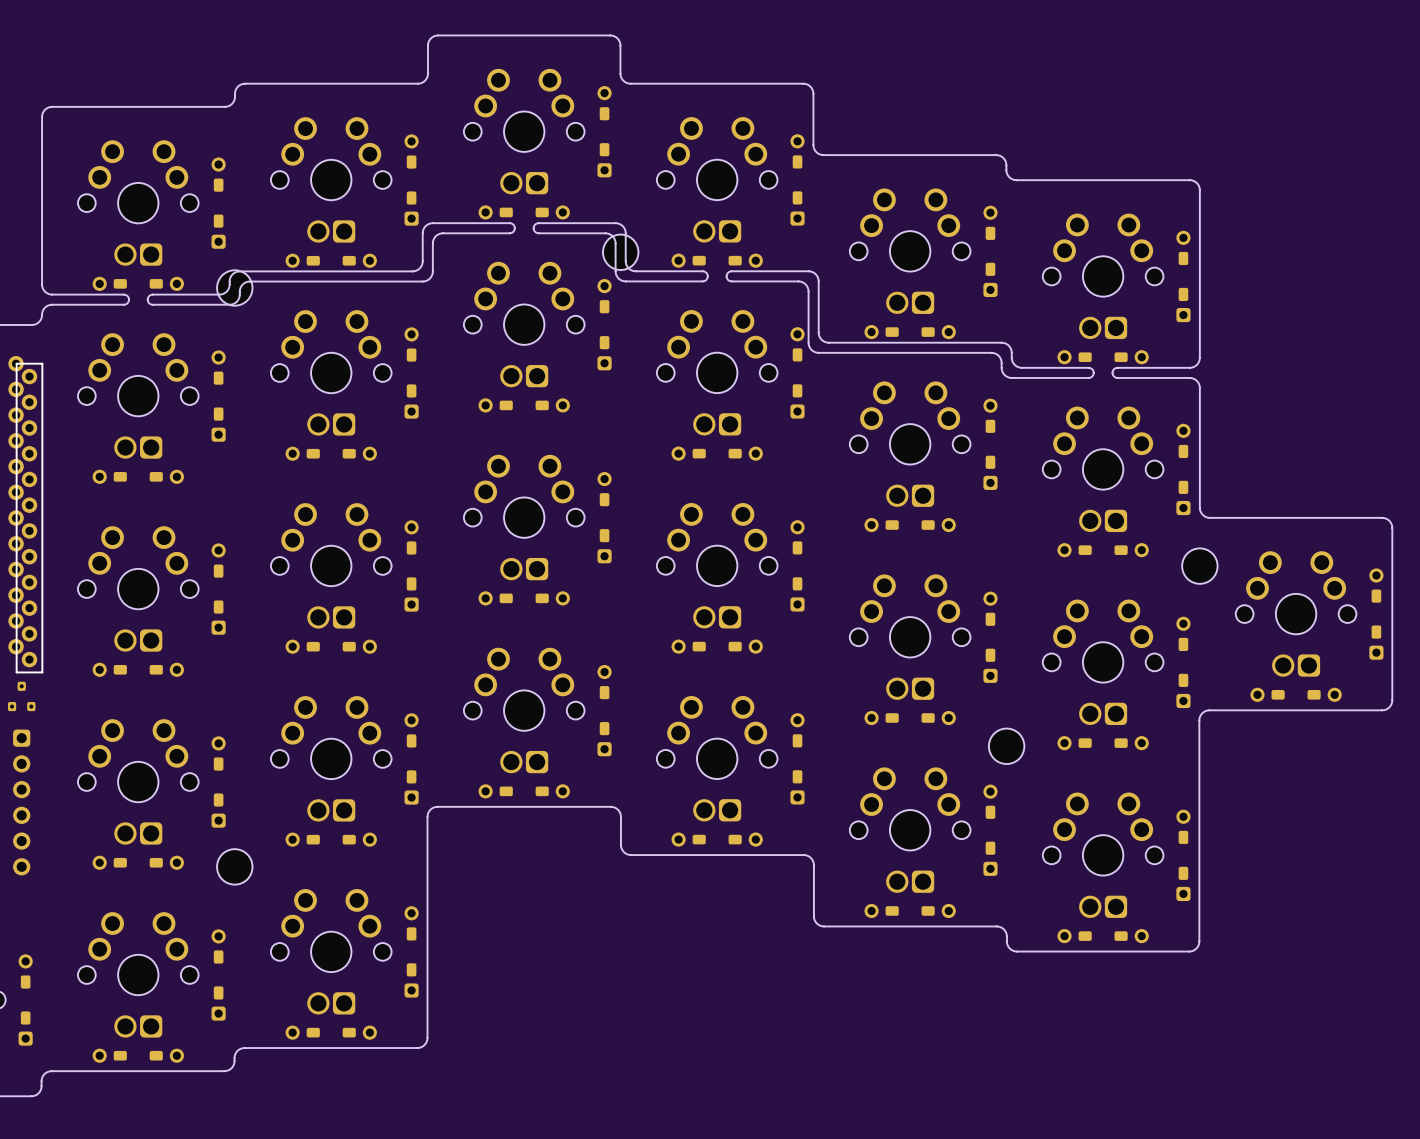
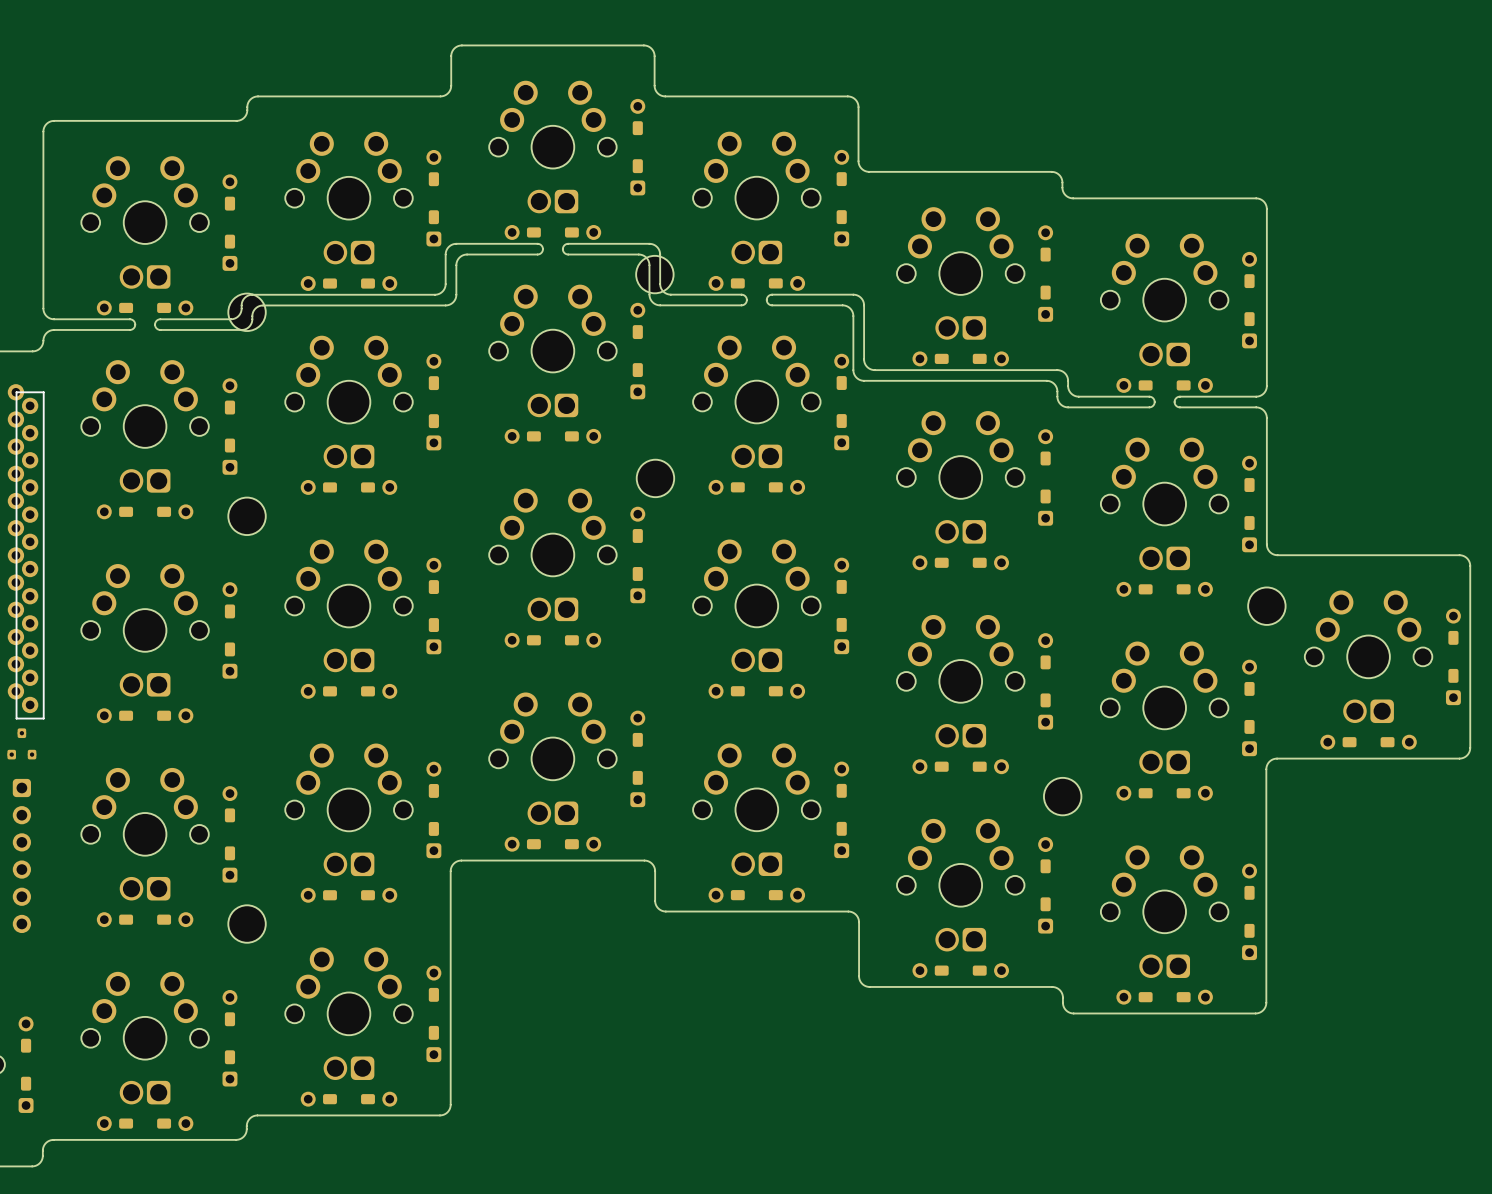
part: none -> (655, 478)
part: none -> (247, 516)

